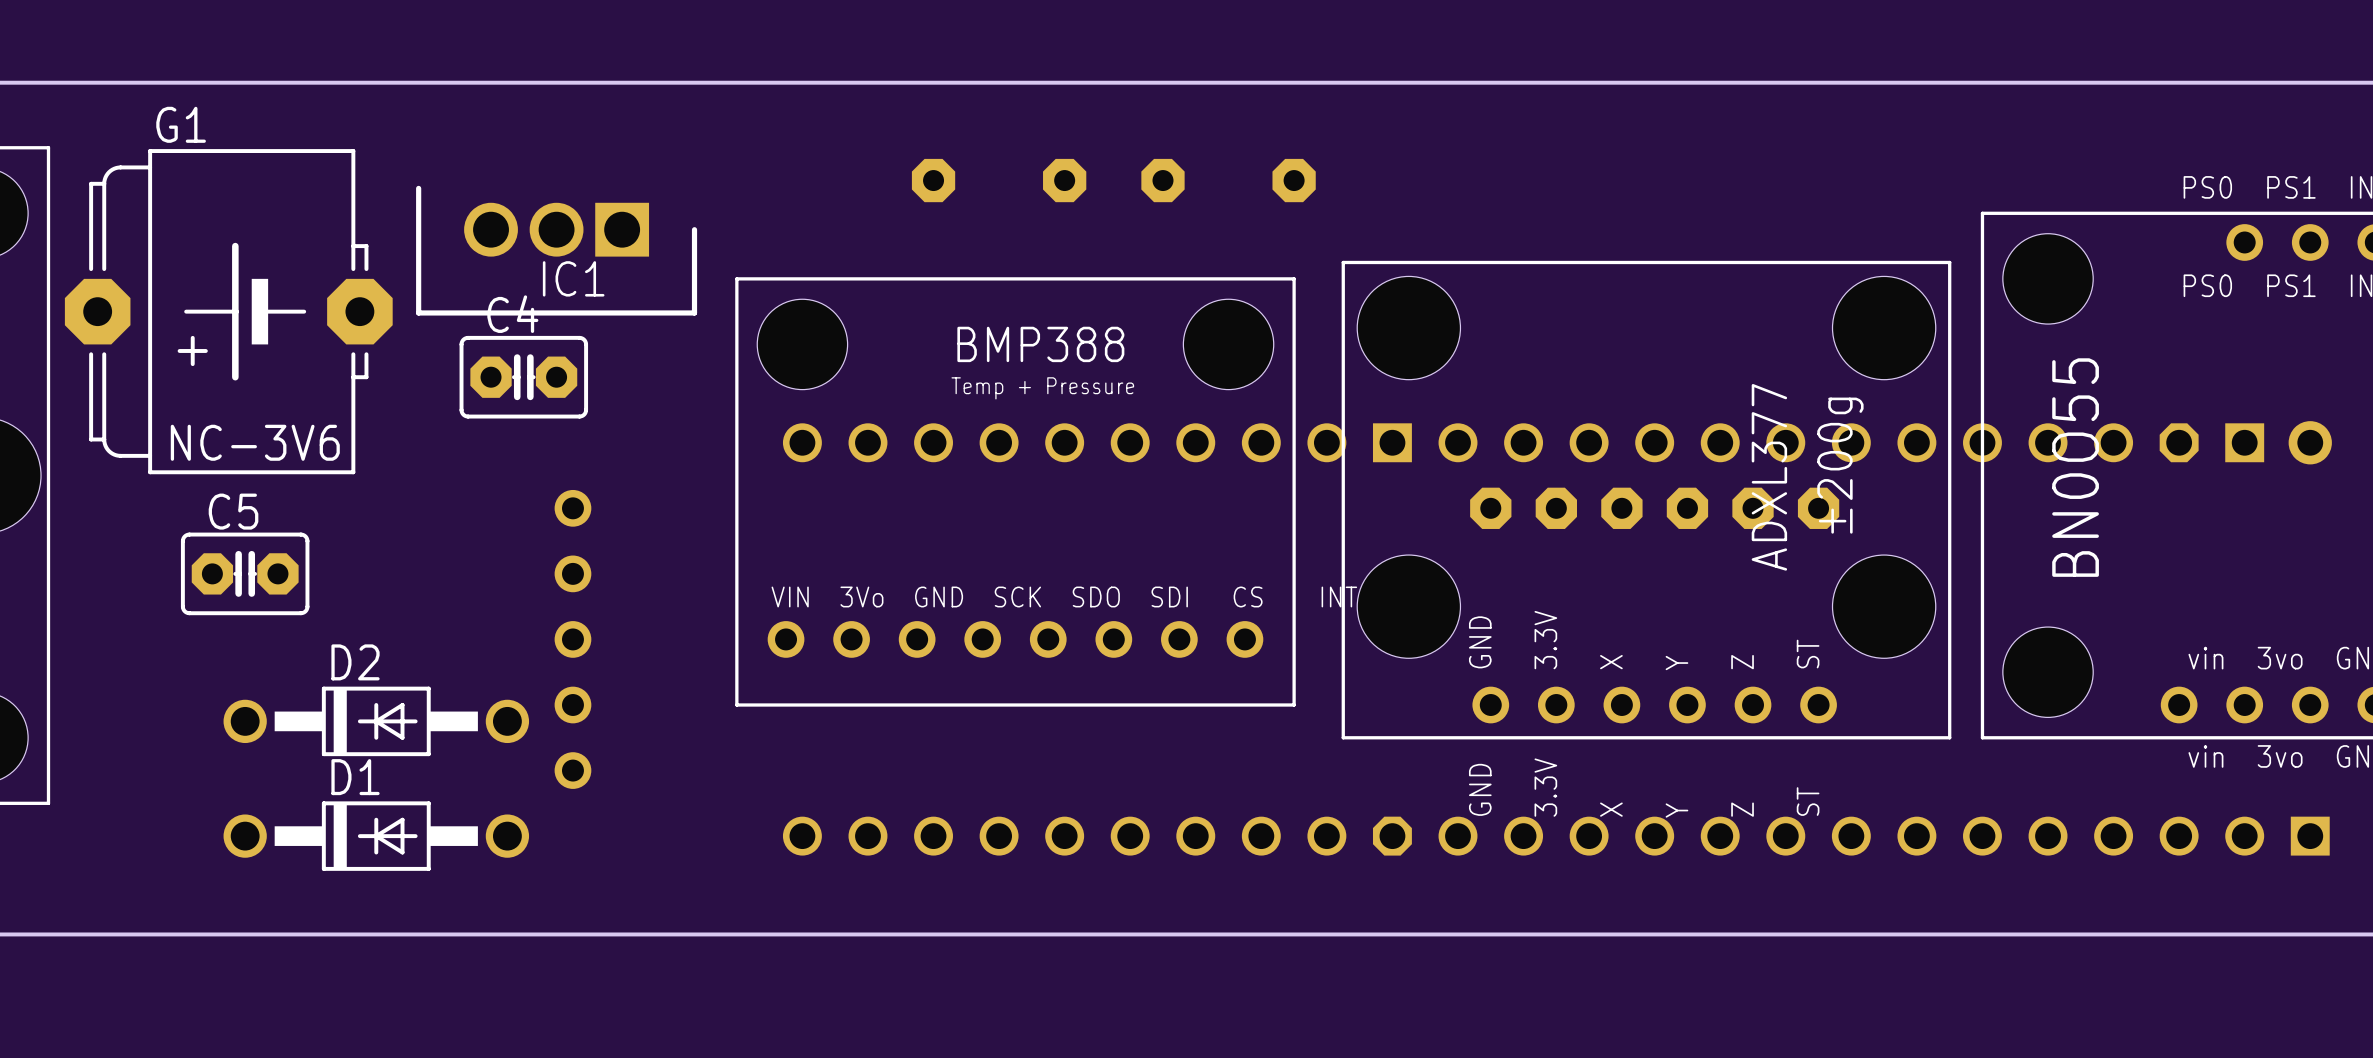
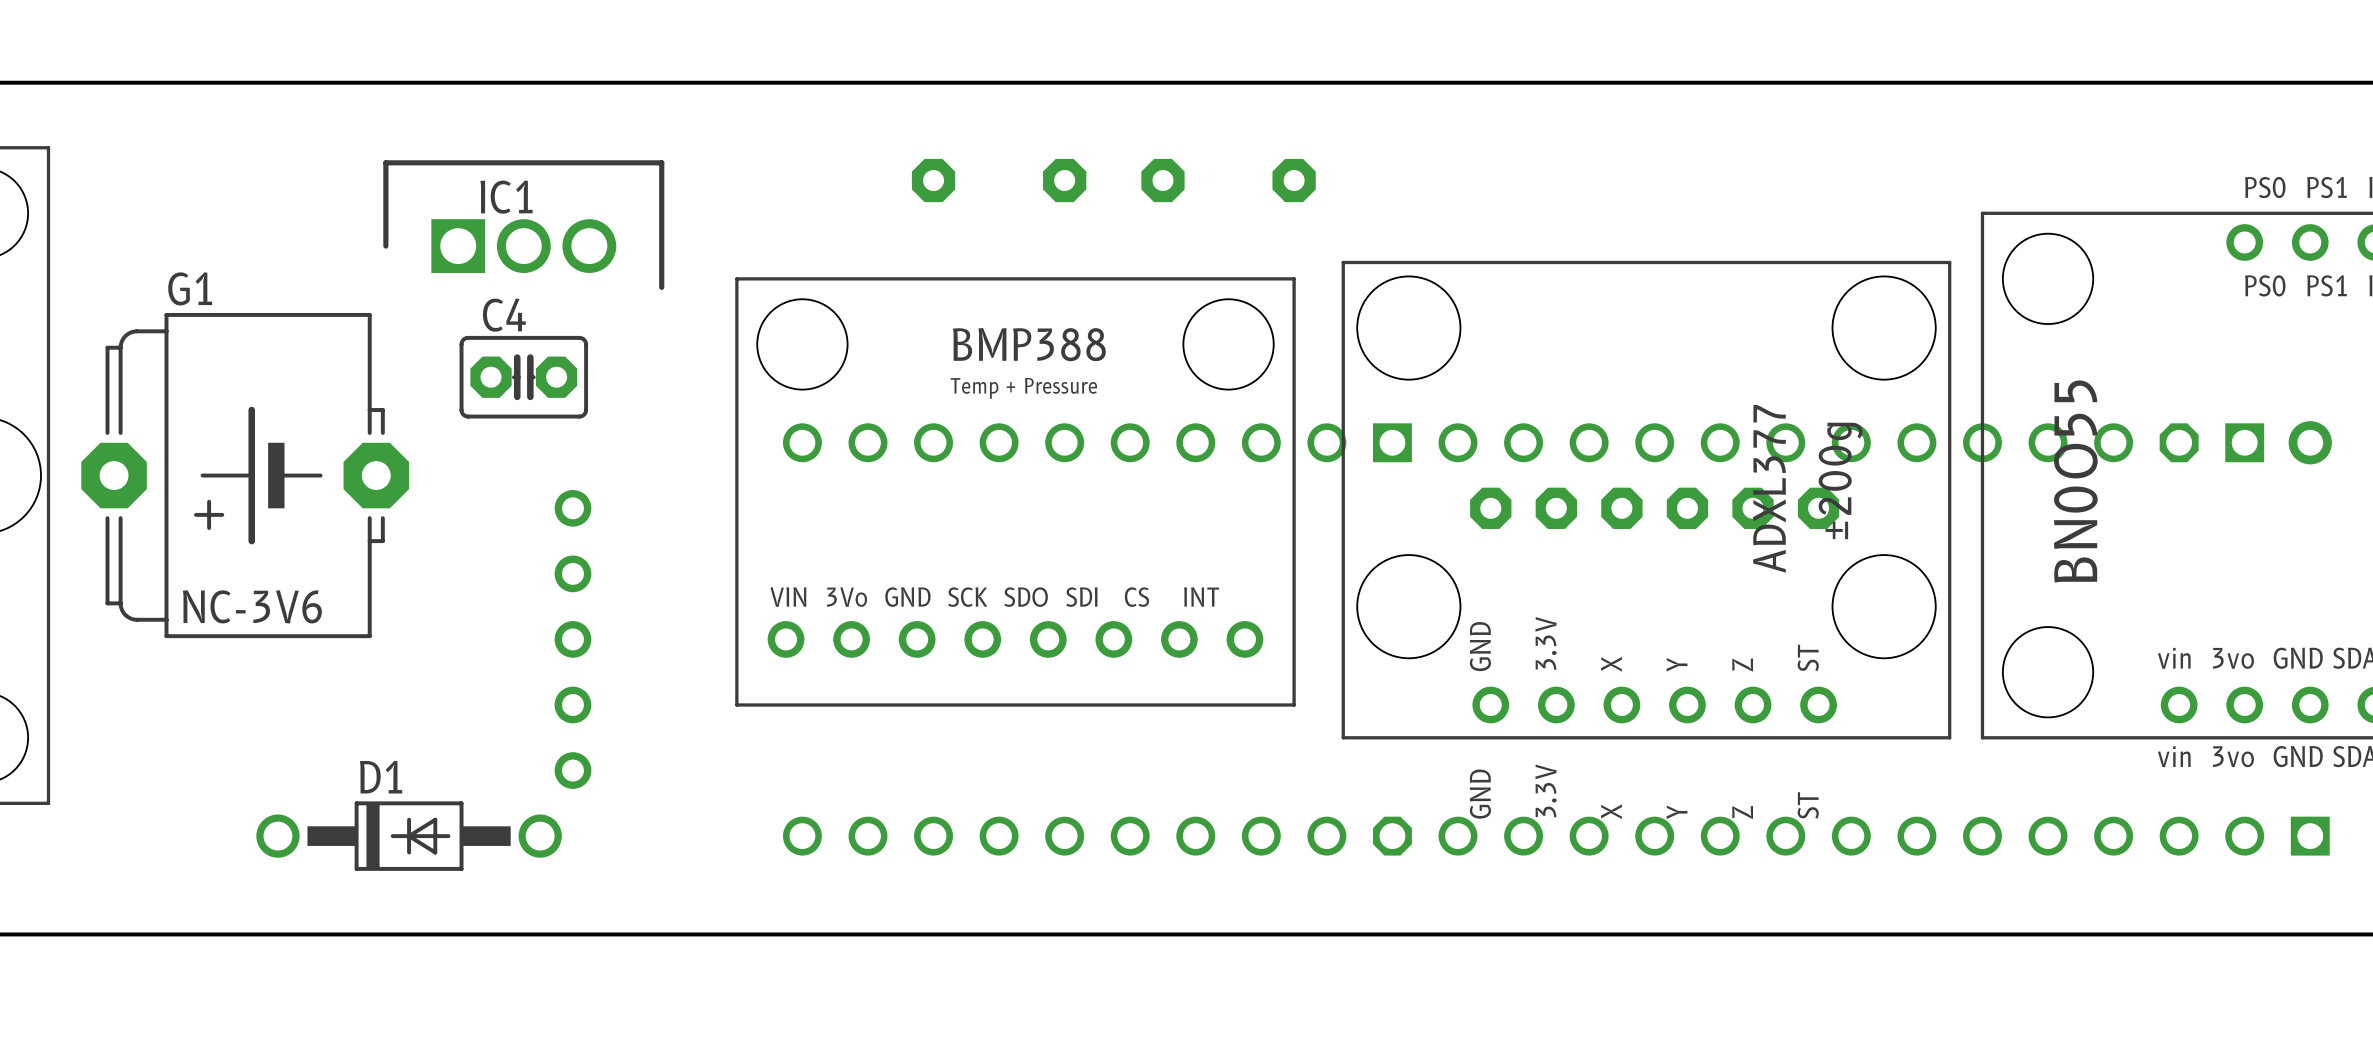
IC1 rotation: 0° (556, 250) -> 180° (523, 225)
G1 position: (228, 311) -> (245, 475)
C5: (245, 573) -> none
D2: (376, 721) -> none
D1 position: (376, 836) -> (409, 836)

